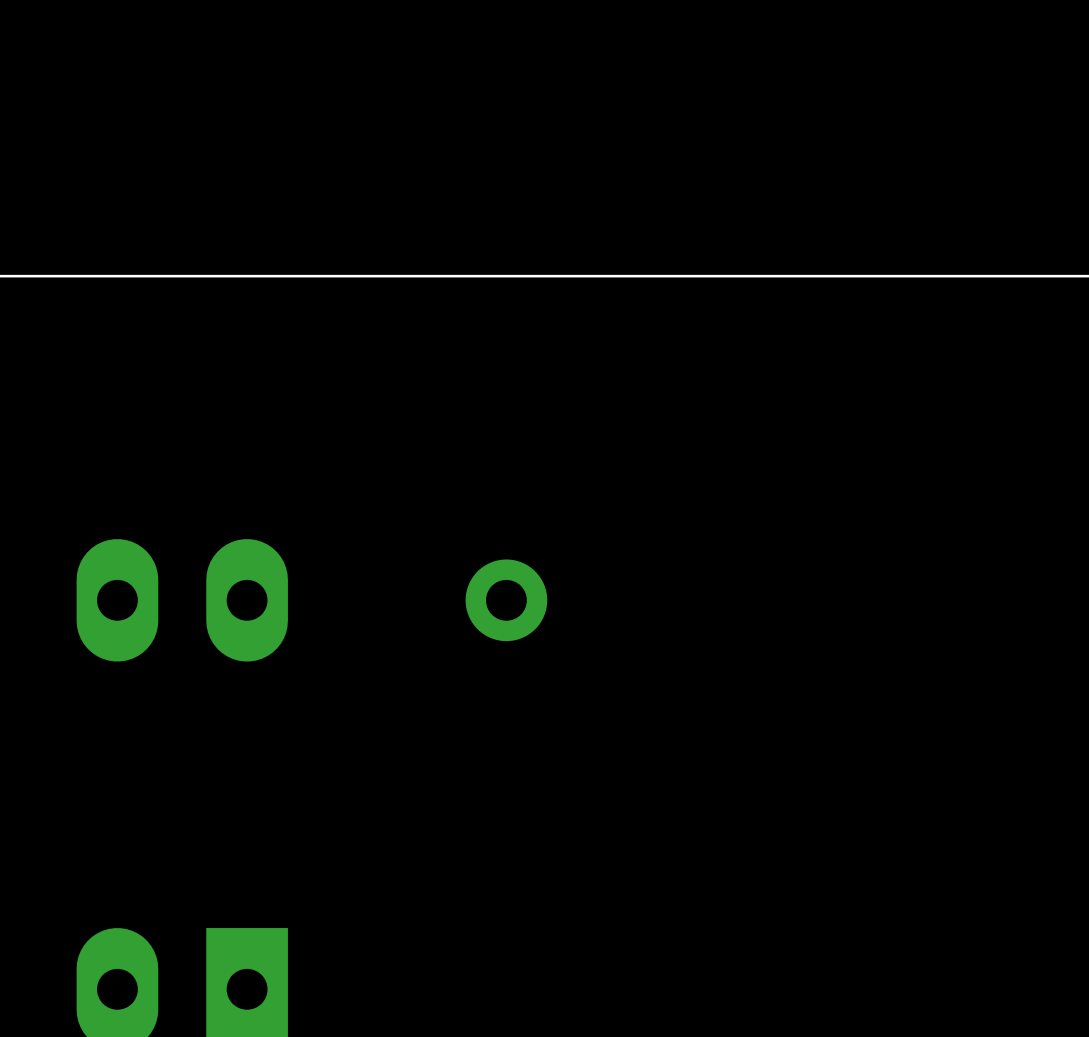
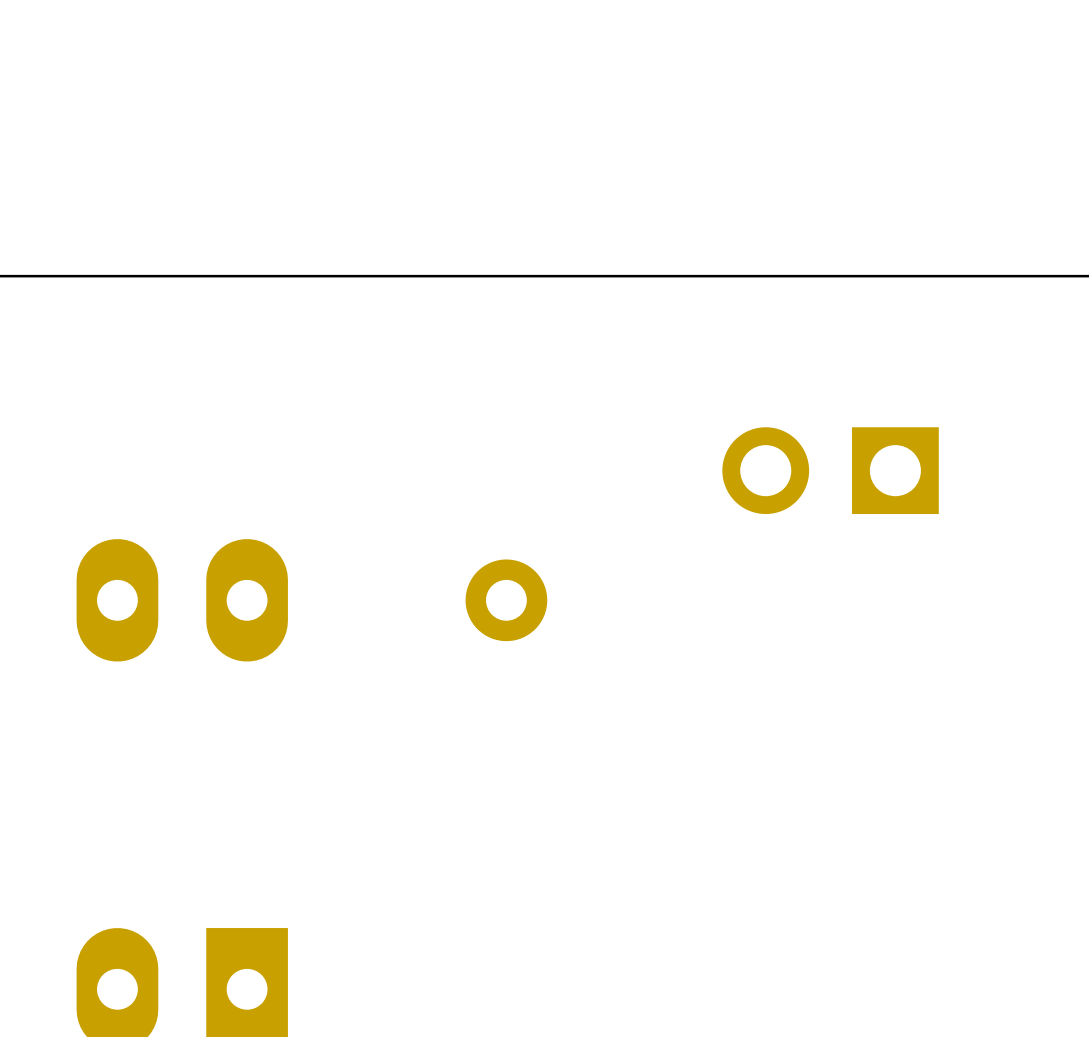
part: none -> (830, 470)

